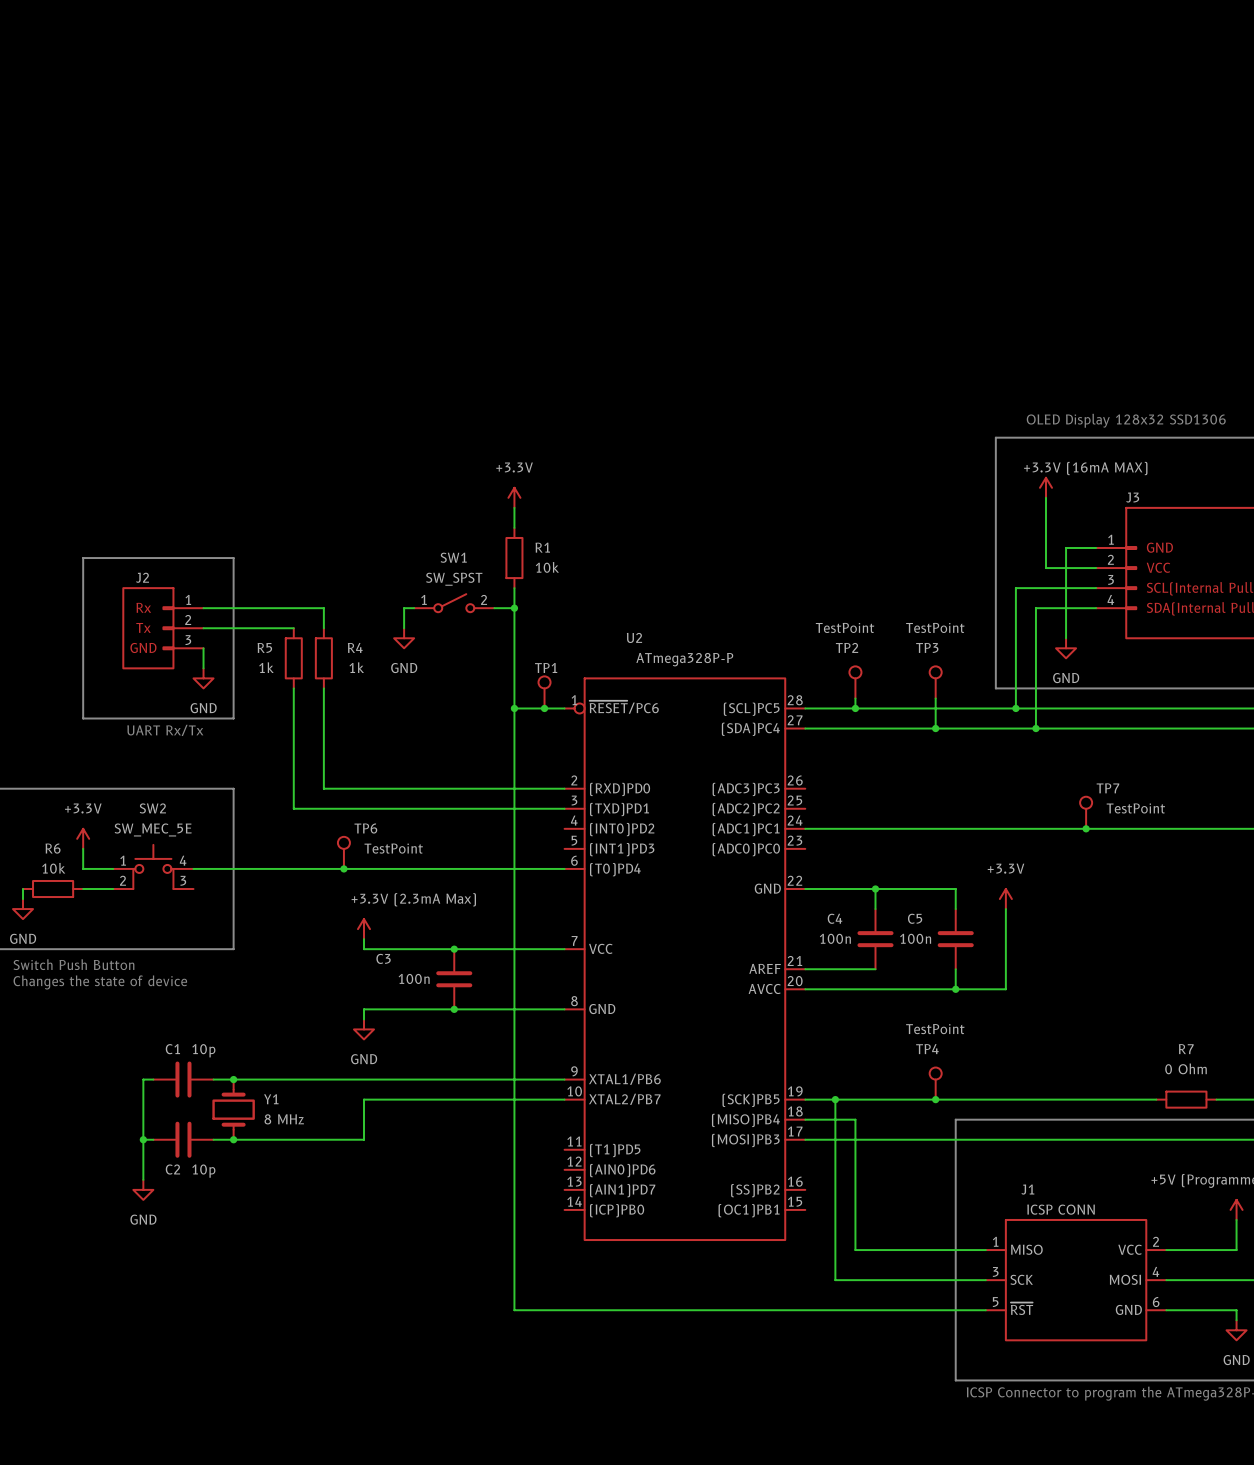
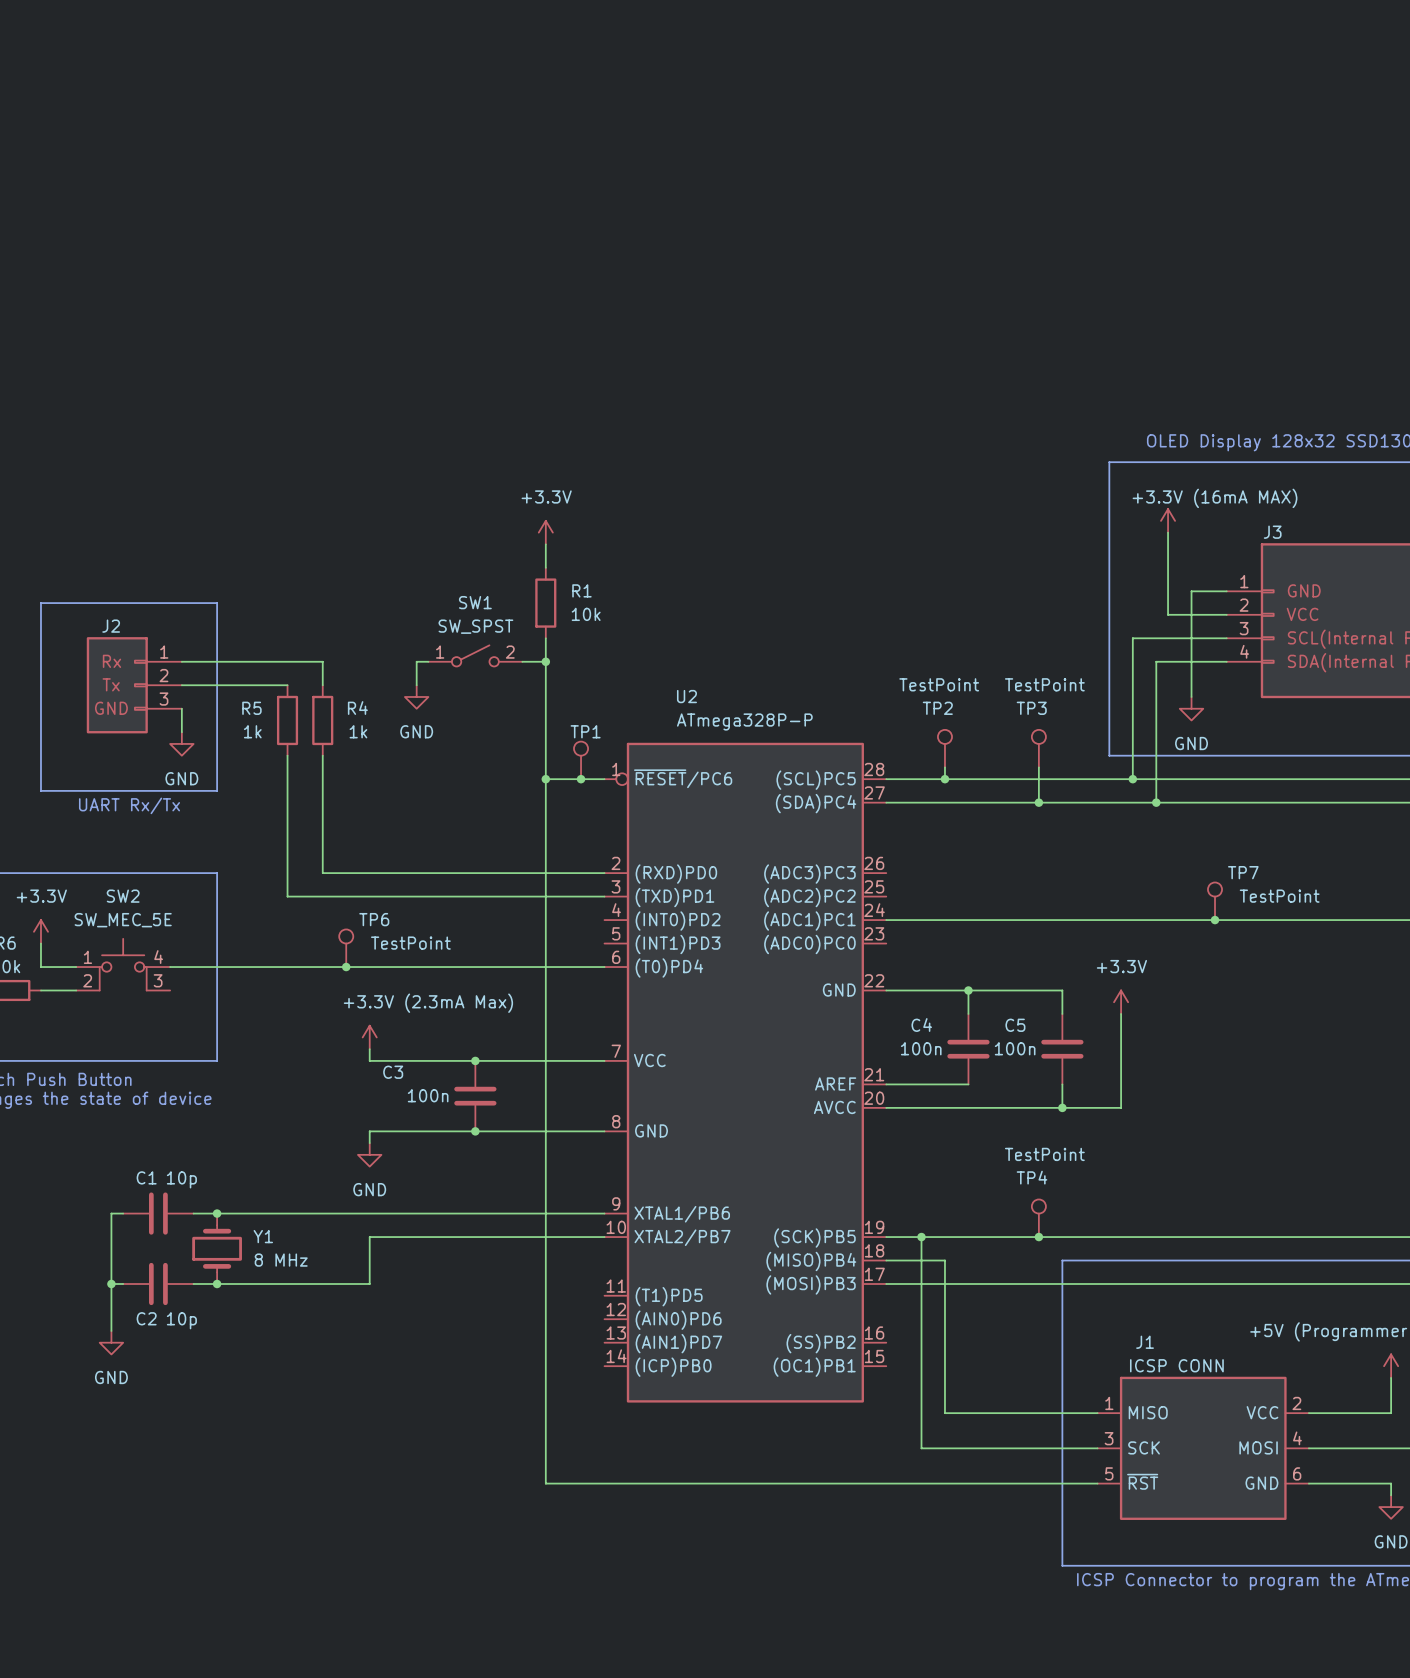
wire: none -> (1297, 1237) (1367, 1237)
R7: 0 Ohm (1186, 1099) -> none

